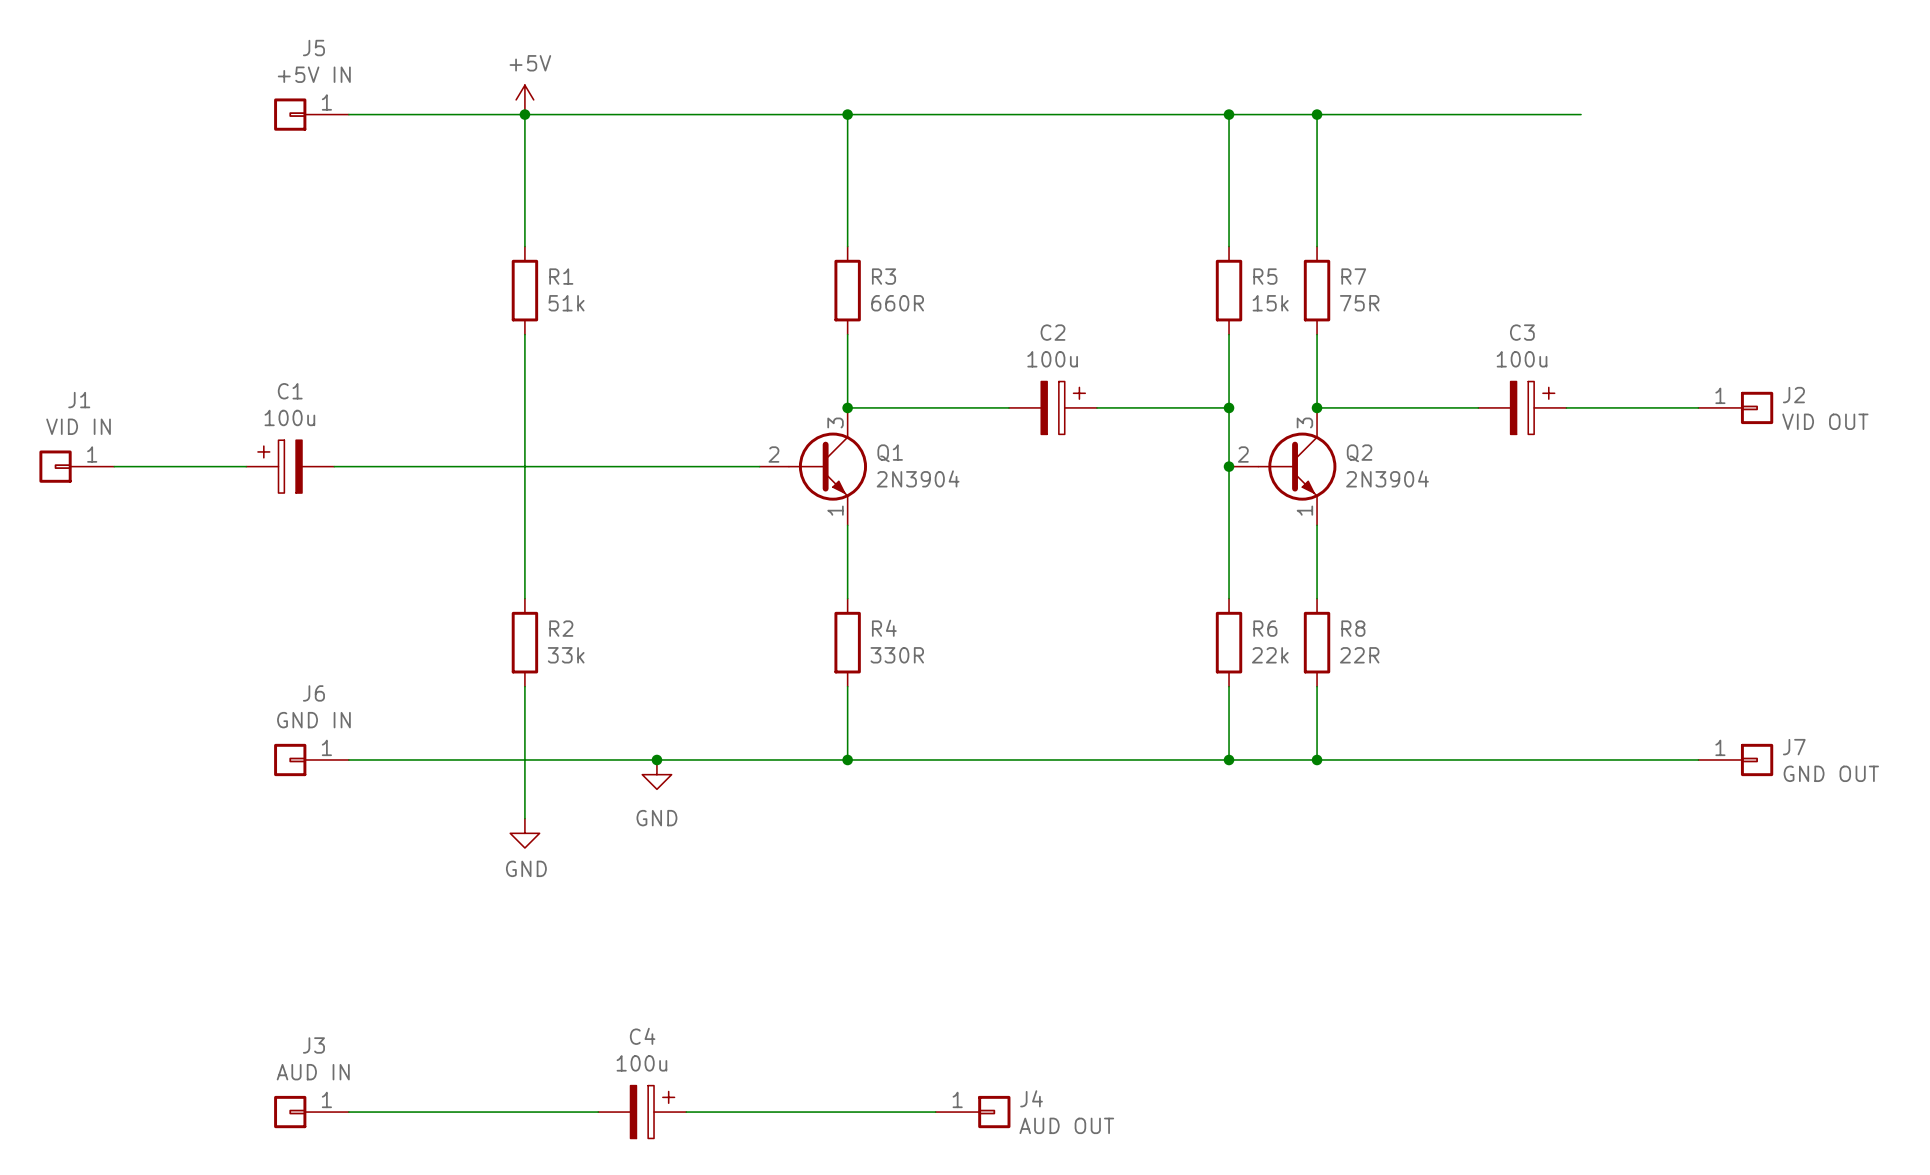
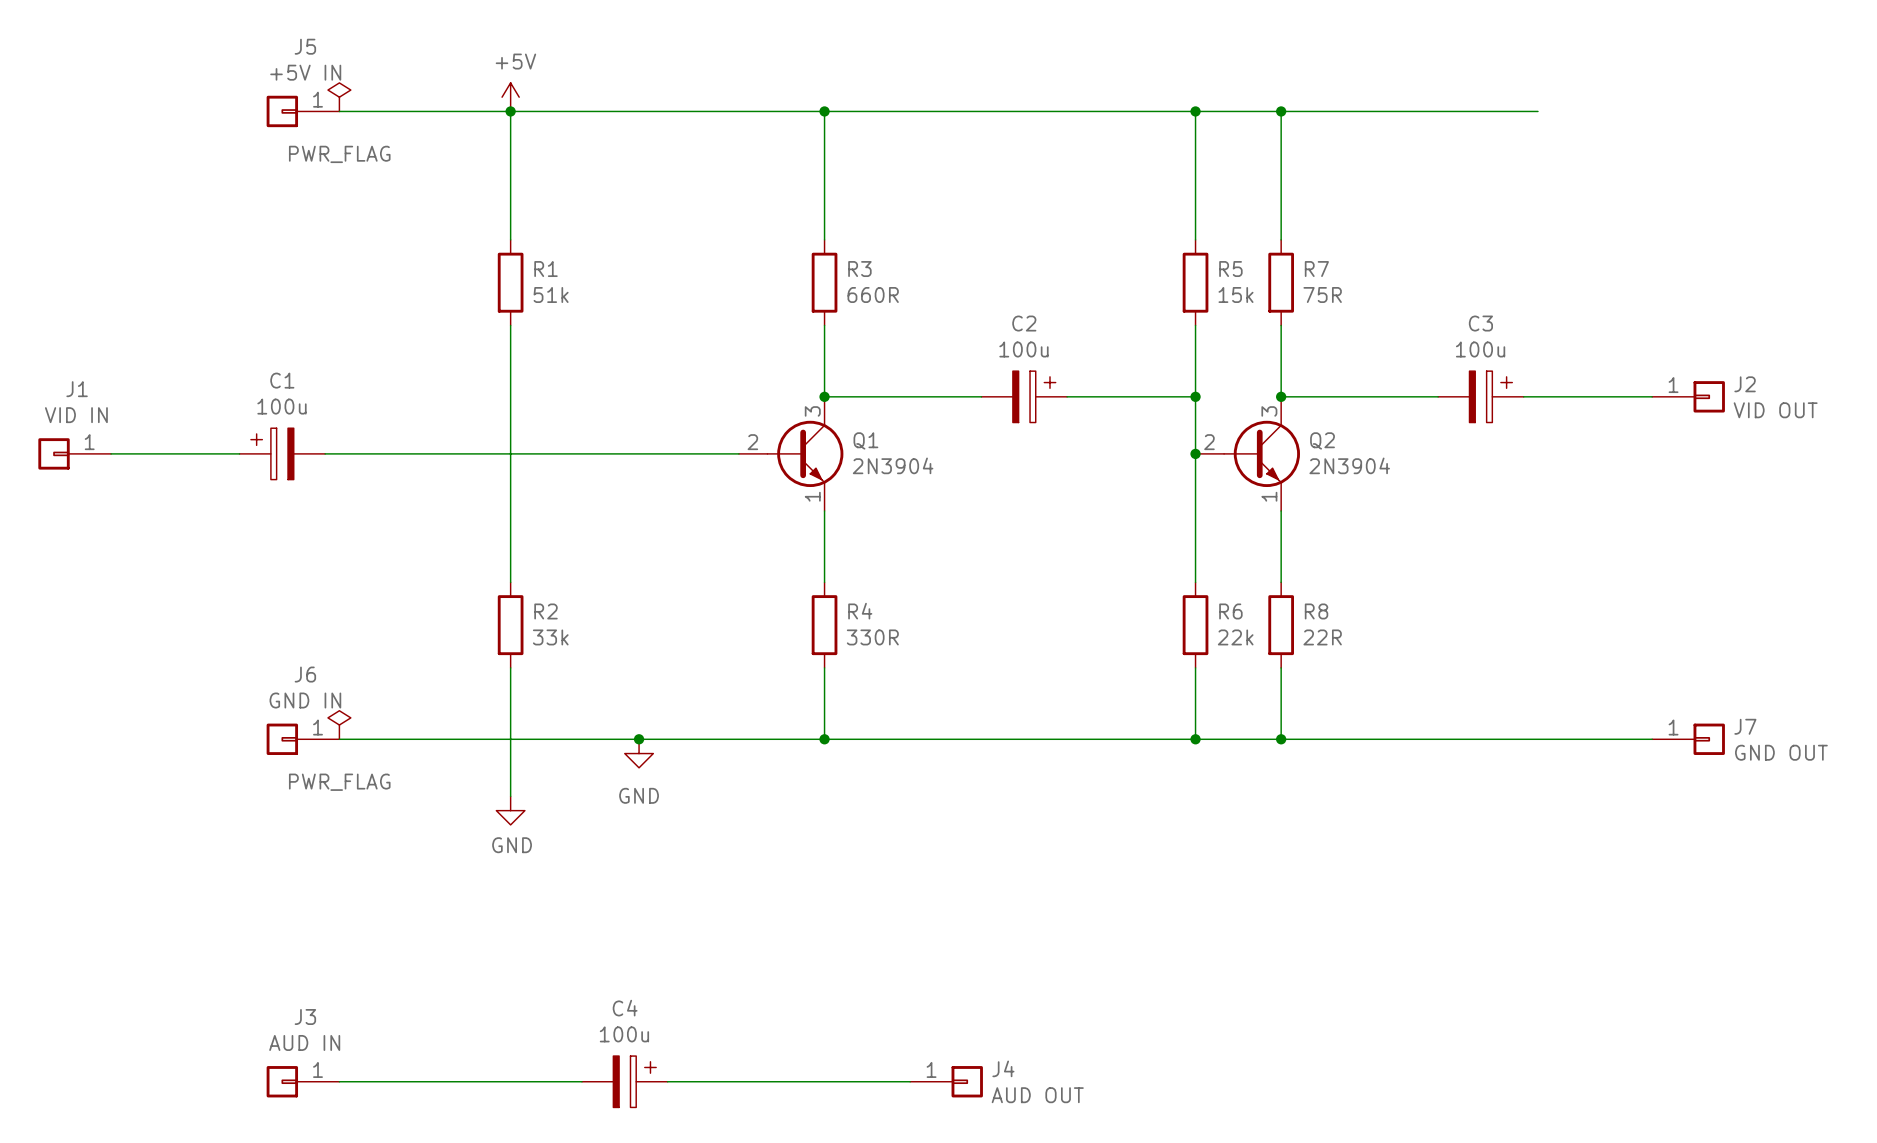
power symbol: none -> PWR_FLAG (339, 97)
power symbol: none -> PWR_FLAG (339, 725)

